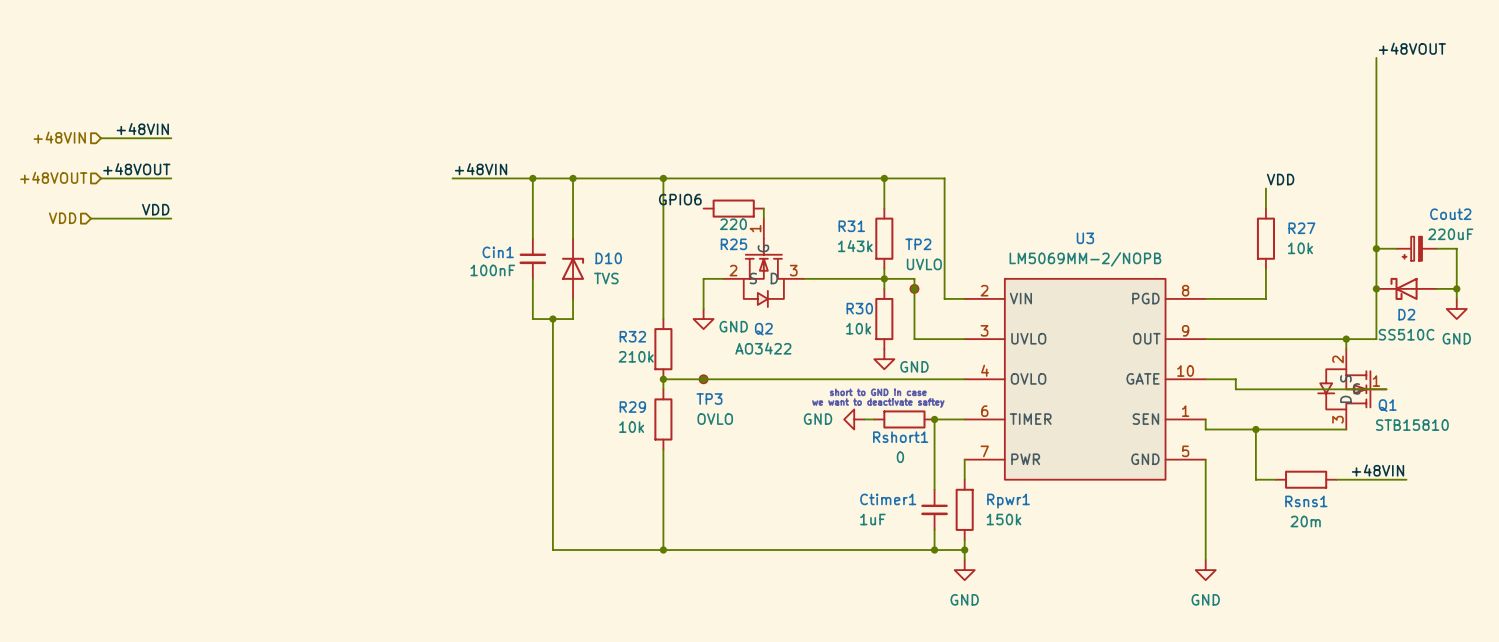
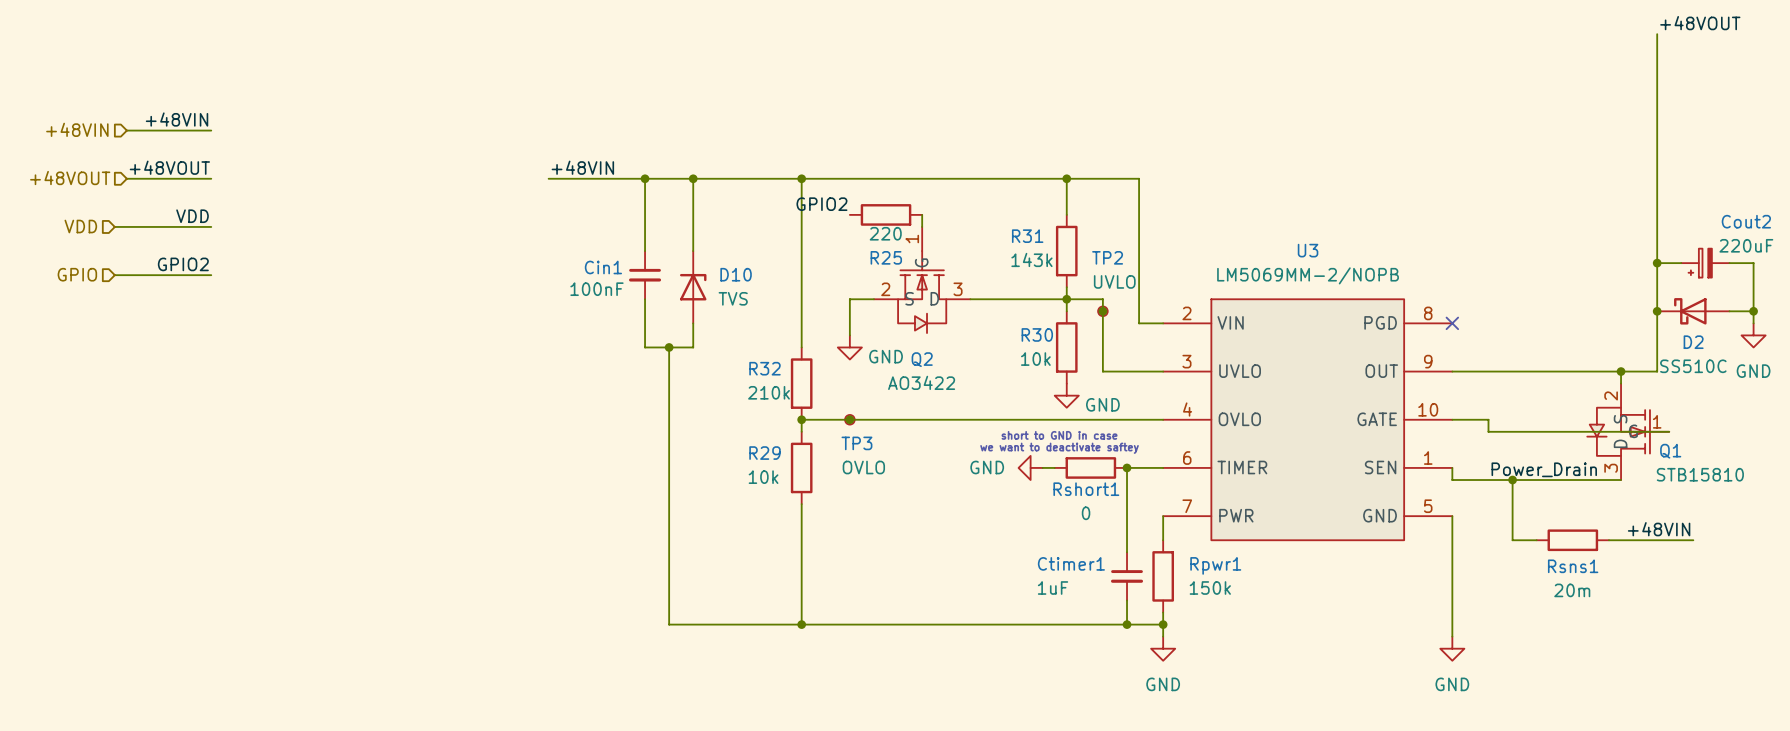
label: VDD (1280, 179) -> none
wire: (1265, 188) (1265, 208) -> none
label: GPIO6 (680, 199) -> GPIO2 (821, 204)
R27: 10k (1265, 238) -> none
label: none -> GPIO2 (183, 264)
hierarchical label: none -> GPIO (77, 274)
wire: none -> (114, 275) (211, 275)
wire: (1265, 268) (1265, 298) (1205, 298) -> none
no-connect mark: none -> (1452, 323)
label: none -> Power_Drain (1544, 469)

